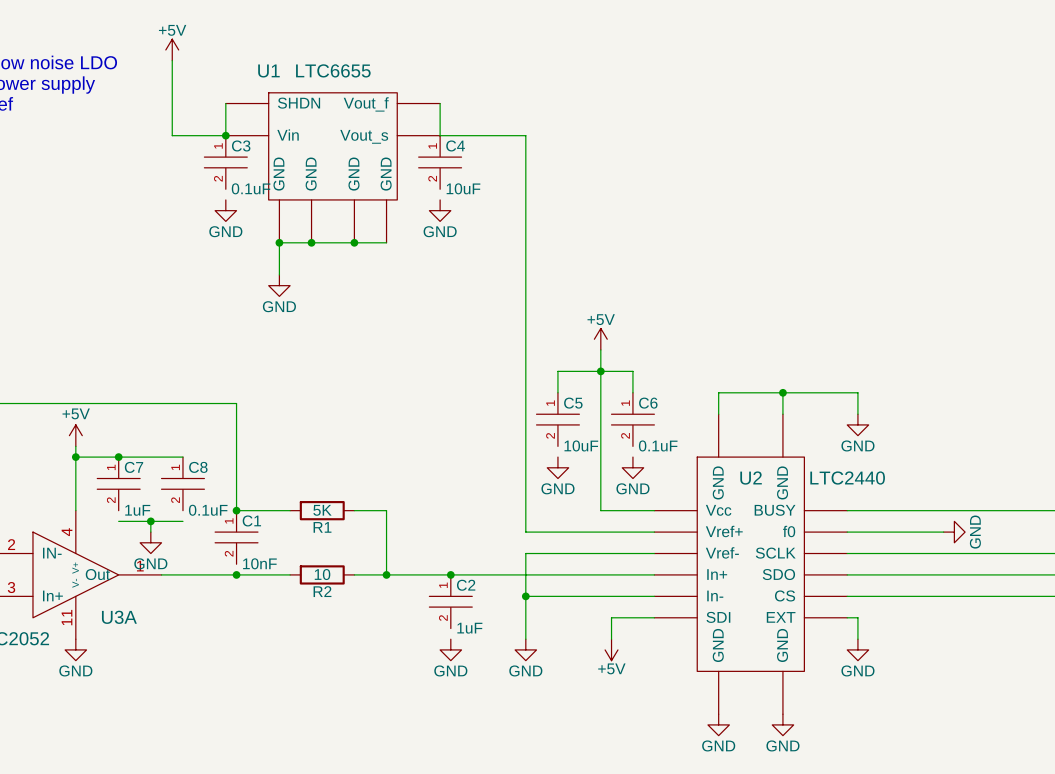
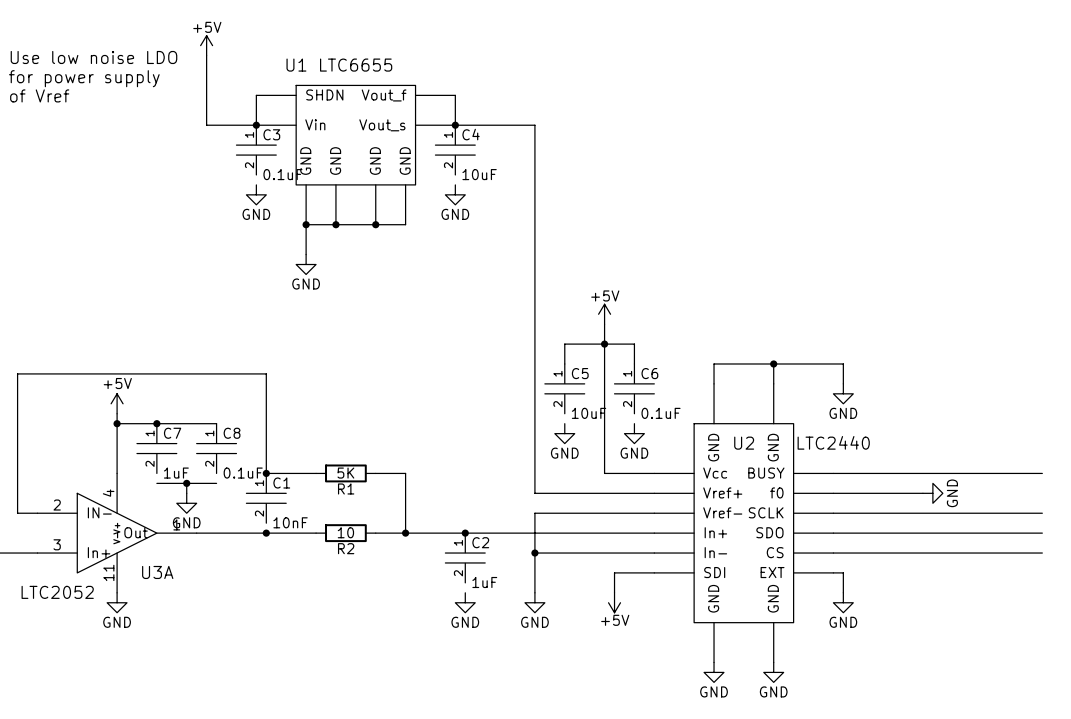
junction: none -> (455, 125)

